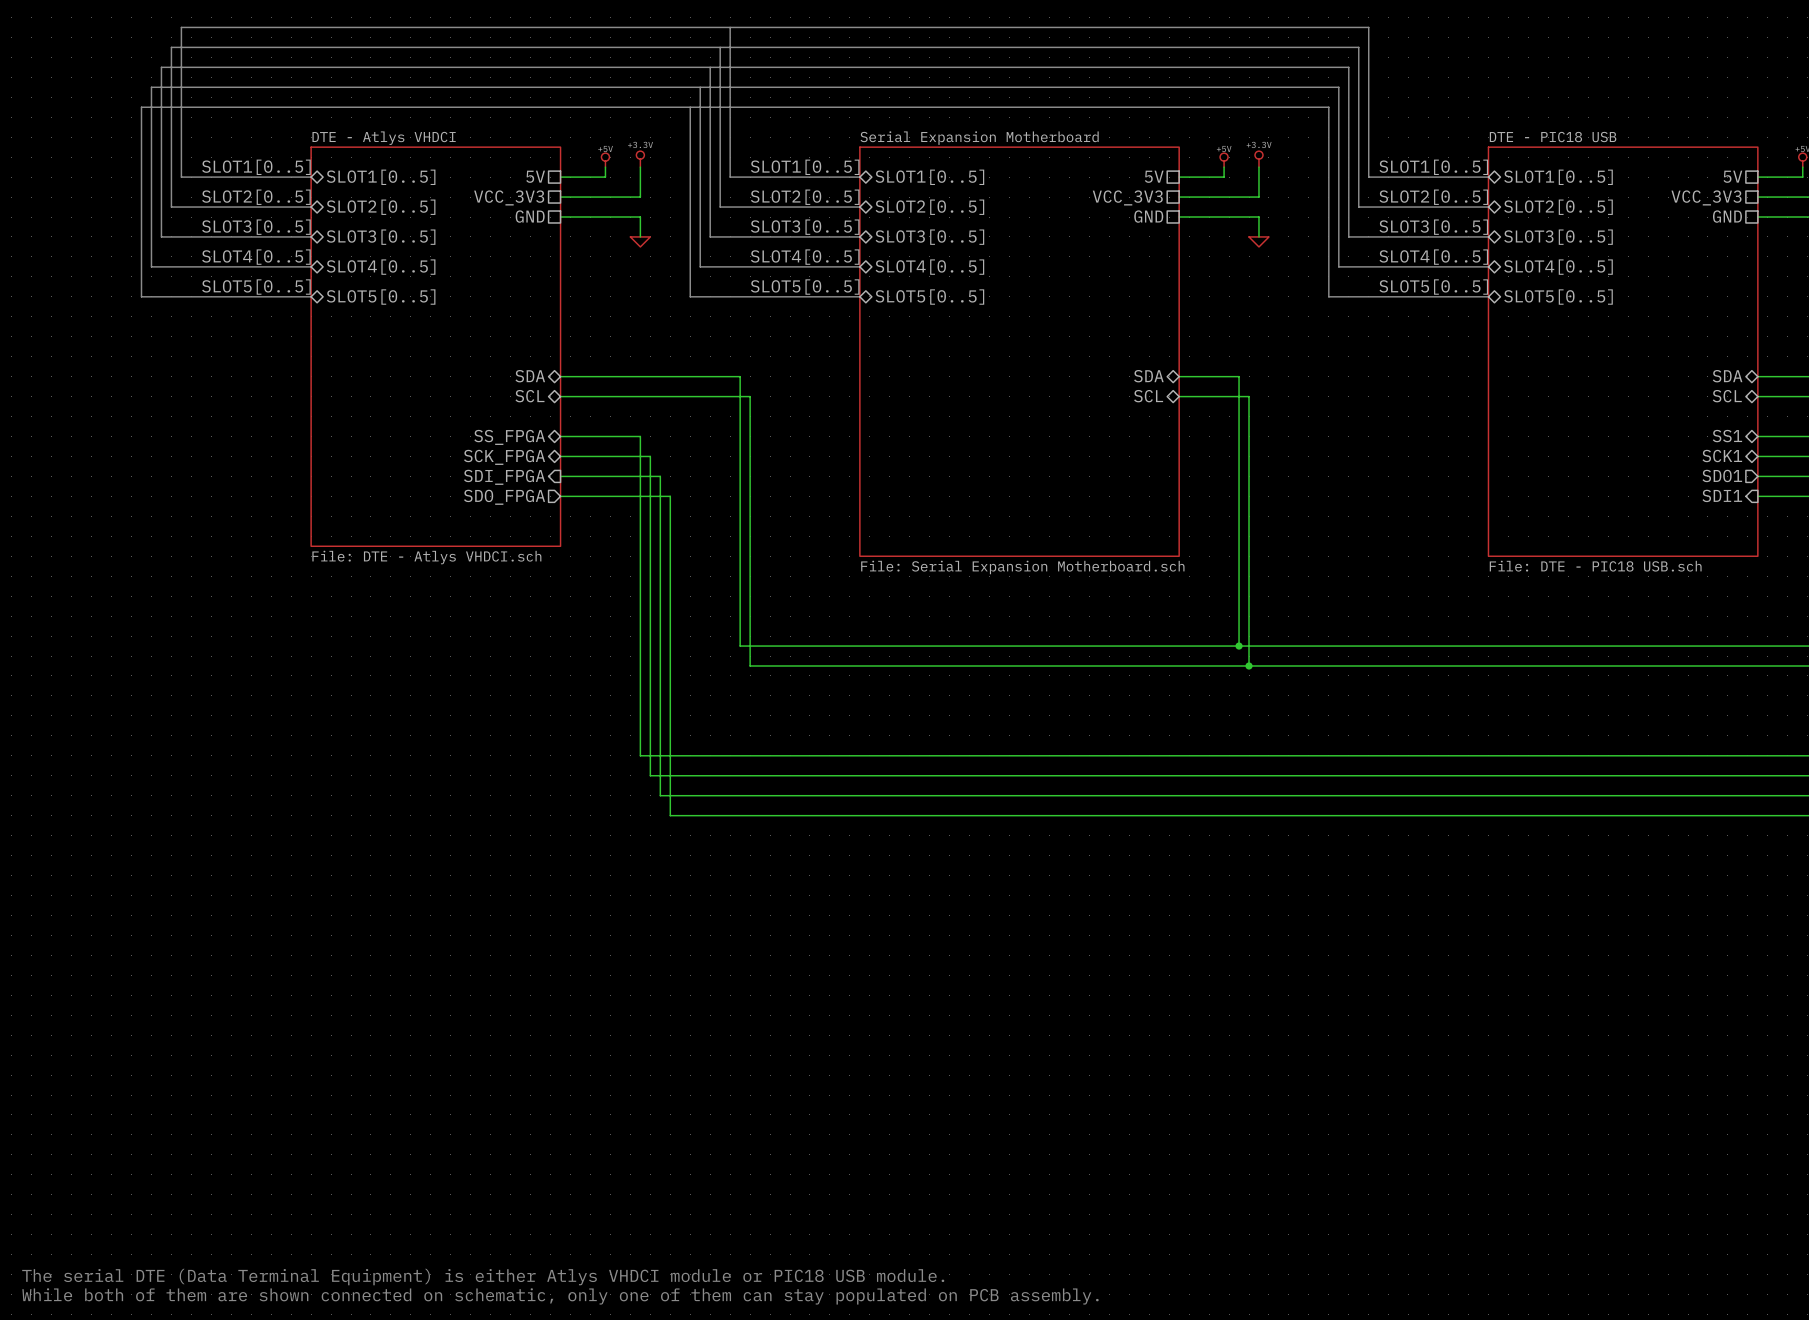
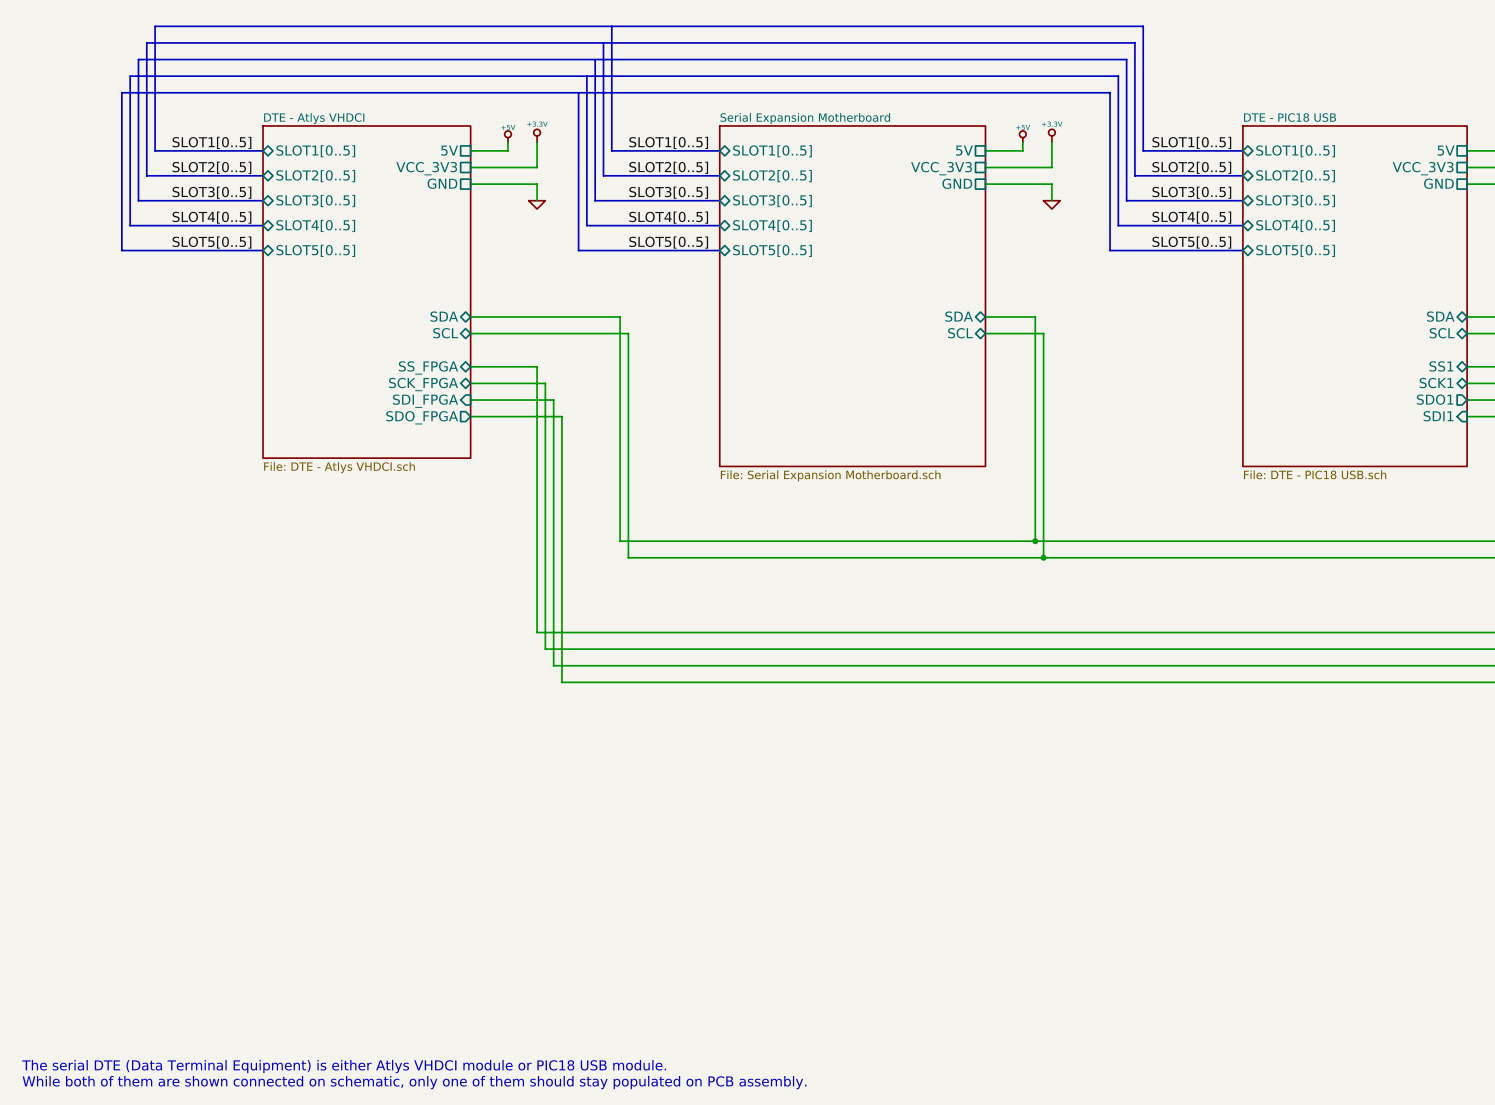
text: While both of them are shown connected on schematic, only one of them can stay populated on PCB assembly. (560, 1296) -> While both of them are shown connected on schematic, only one of them should stay populated on PCB assembly. (414, 1082)

